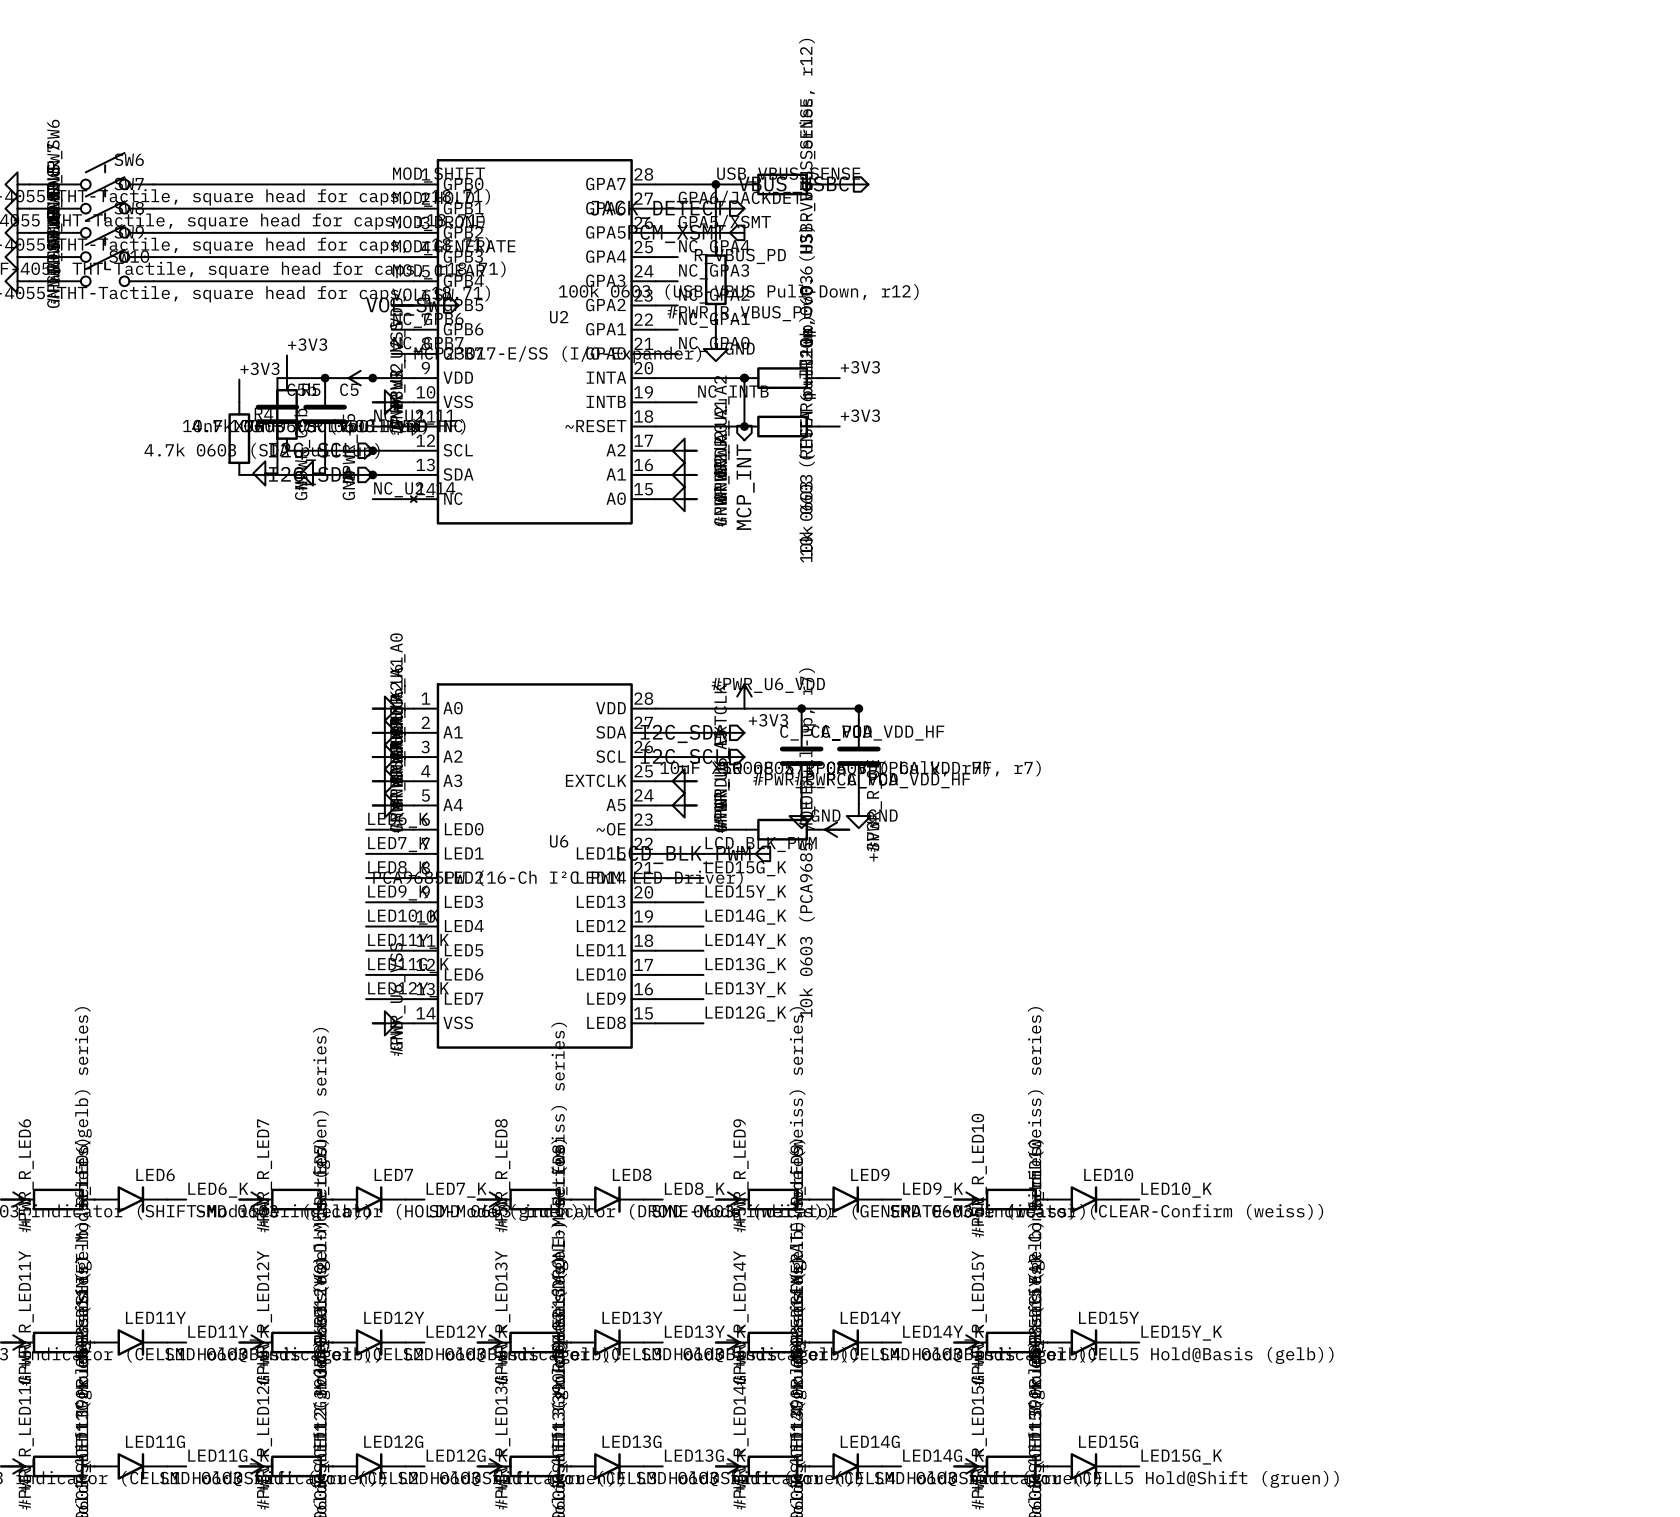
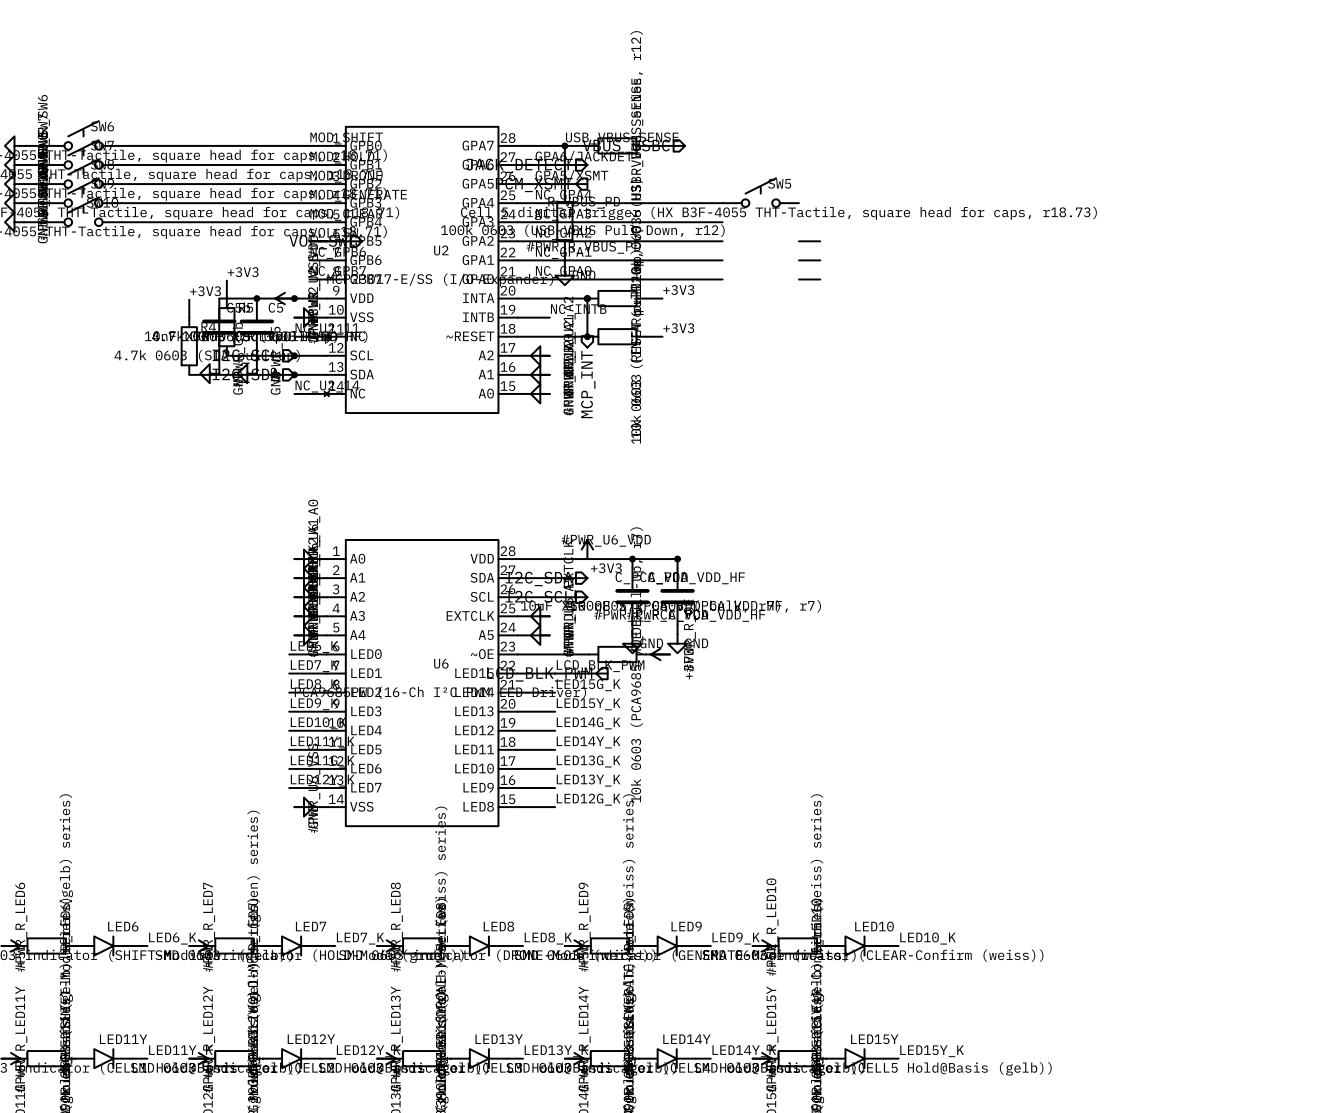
SW5: none -> Cell 5 digital trigger (HX B3F-4055 THT-Tactile, square head for caps, r18.73) (760, 192)
wire: none -> (534, 203) (722, 203)
wire: none -> (534, 222) (722, 222)
wire: none -> (534, 241) (722, 241)
wire: none -> (798, 241) (820, 241)
wire: none -> (534, 260) (722, 260)
wire: none -> (798, 260) (820, 260)
wire: none -> (534, 279) (722, 279)
wire: none -> (798, 279) (820, 279)

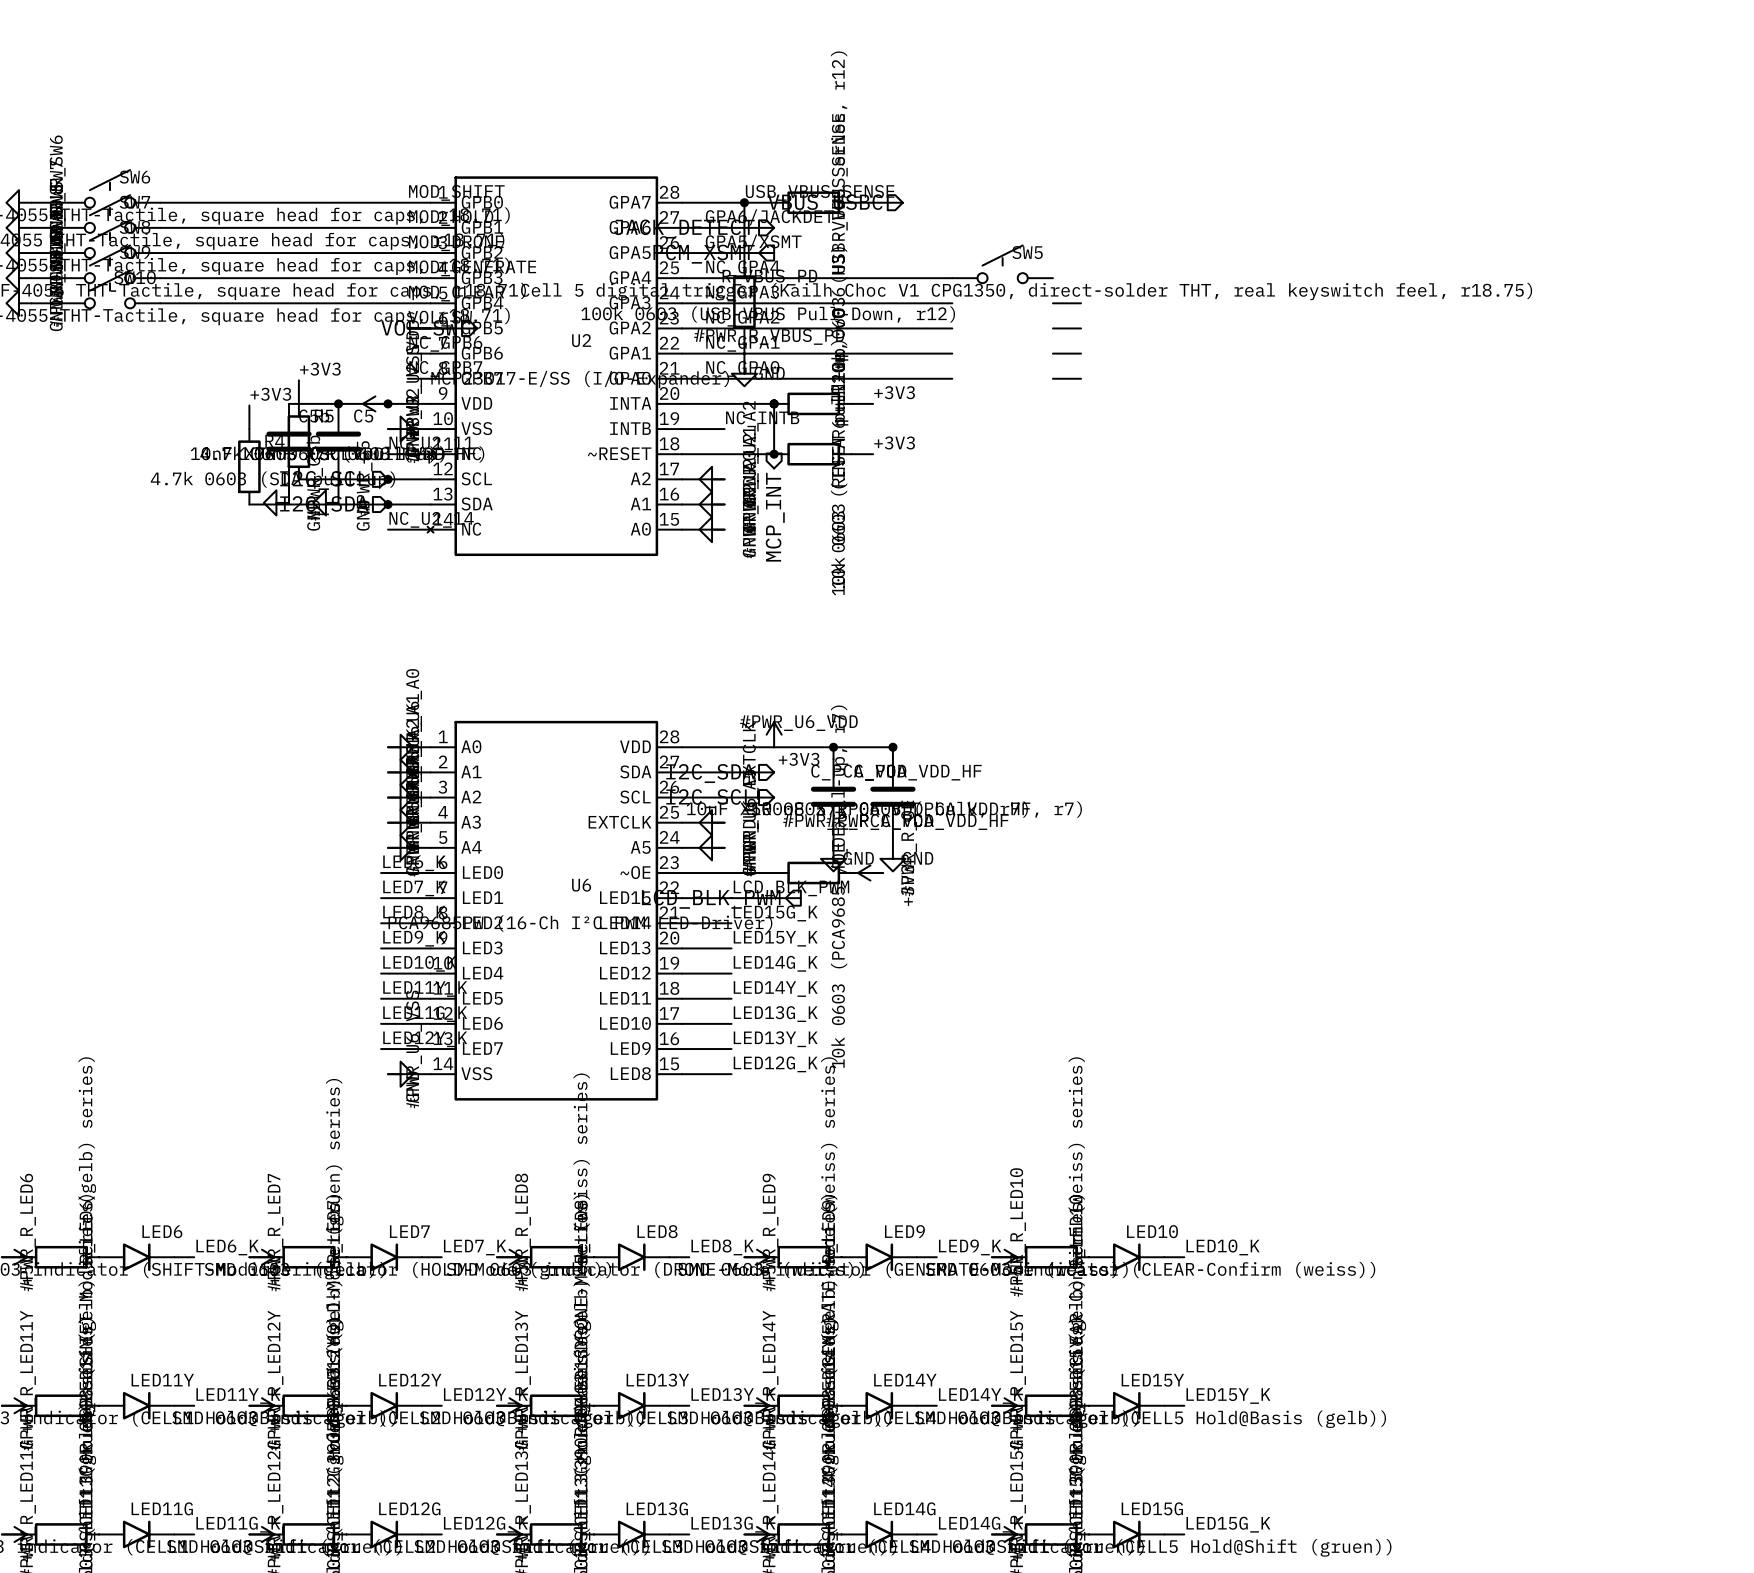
SW5 value: Cell 5 digital trigger (HX B3F-4055 THT-Tactile, square head for caps, r18.73) (778, 213) -> Cell 5 digital trigger (Kailh Choc V1 CPG1350, direct-solder THT, real keyswitch feel, r18.75) (1026, 291)
wire: none -> (1052, 303) (1081, 303)

